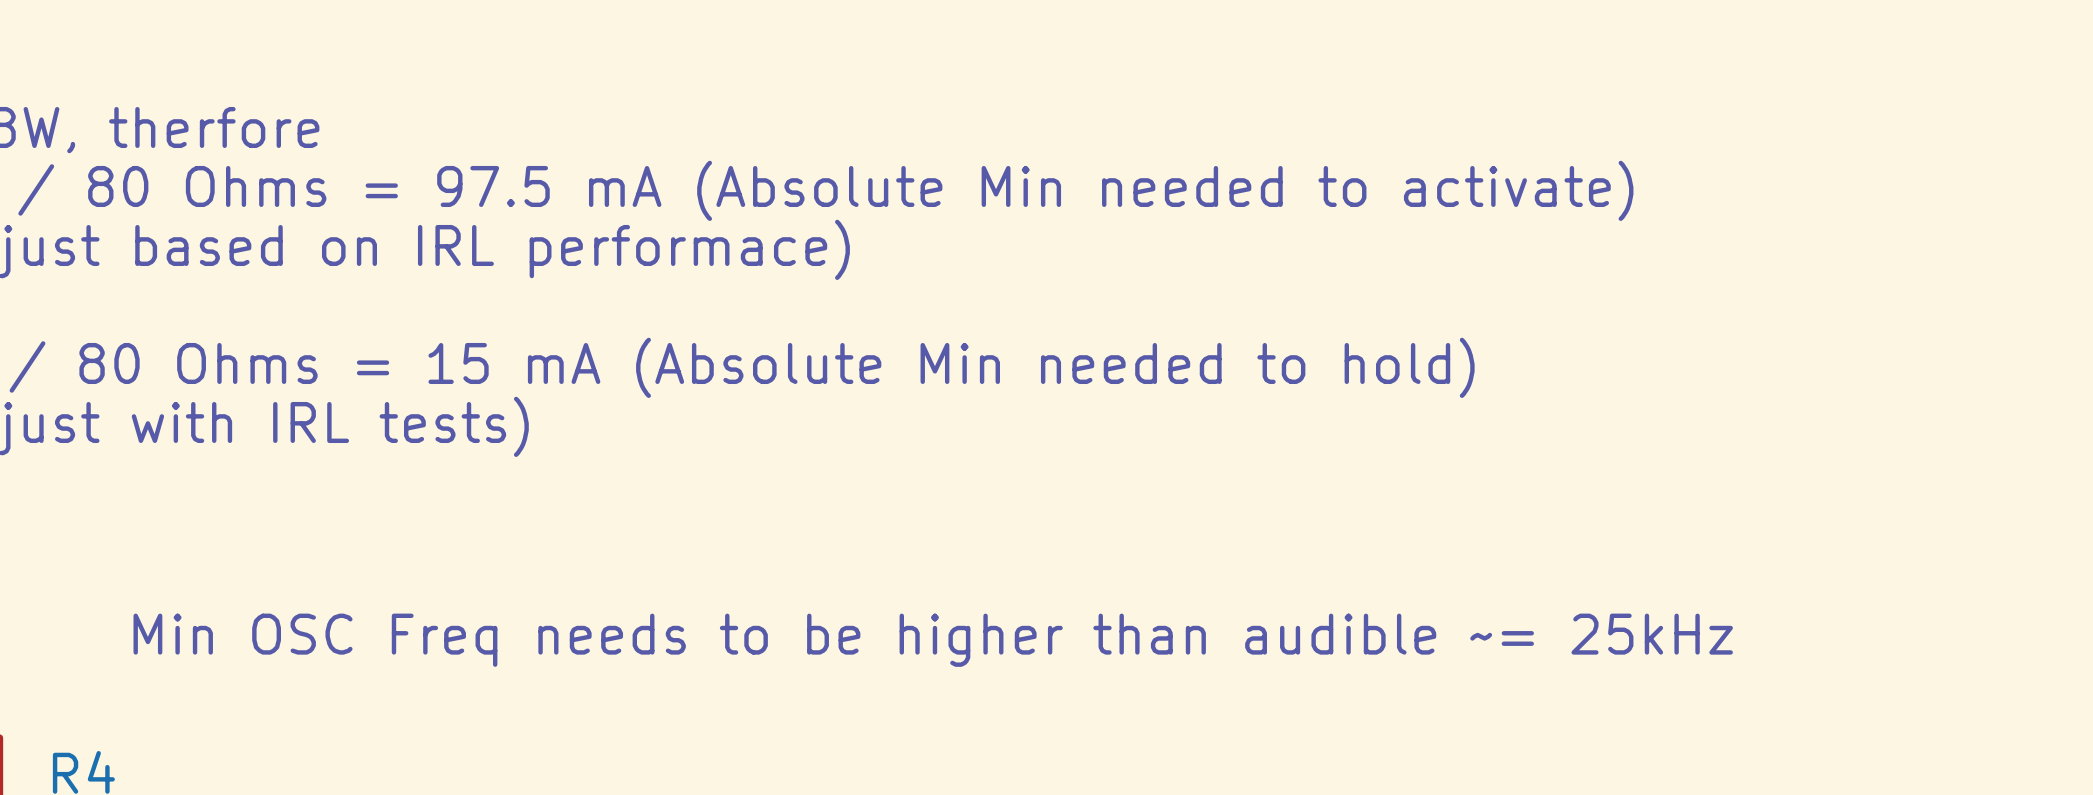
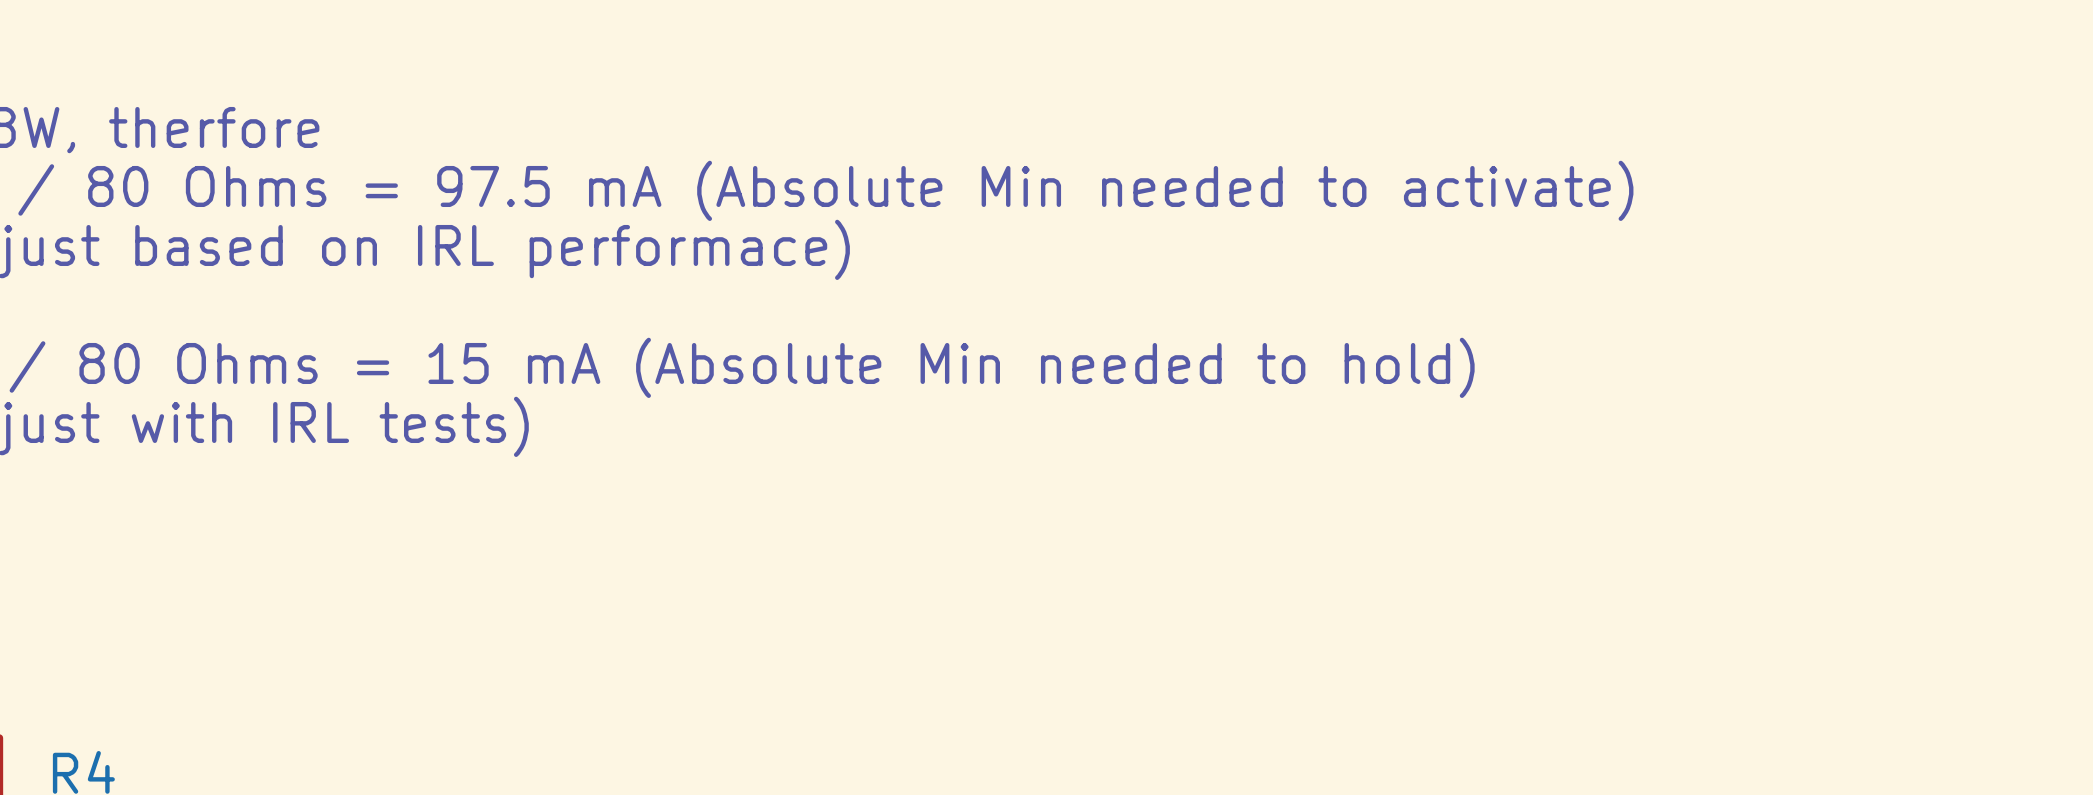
text: Min OSC Freq needs to be higher than audible ~= 25kHz (933, 640) -> none

